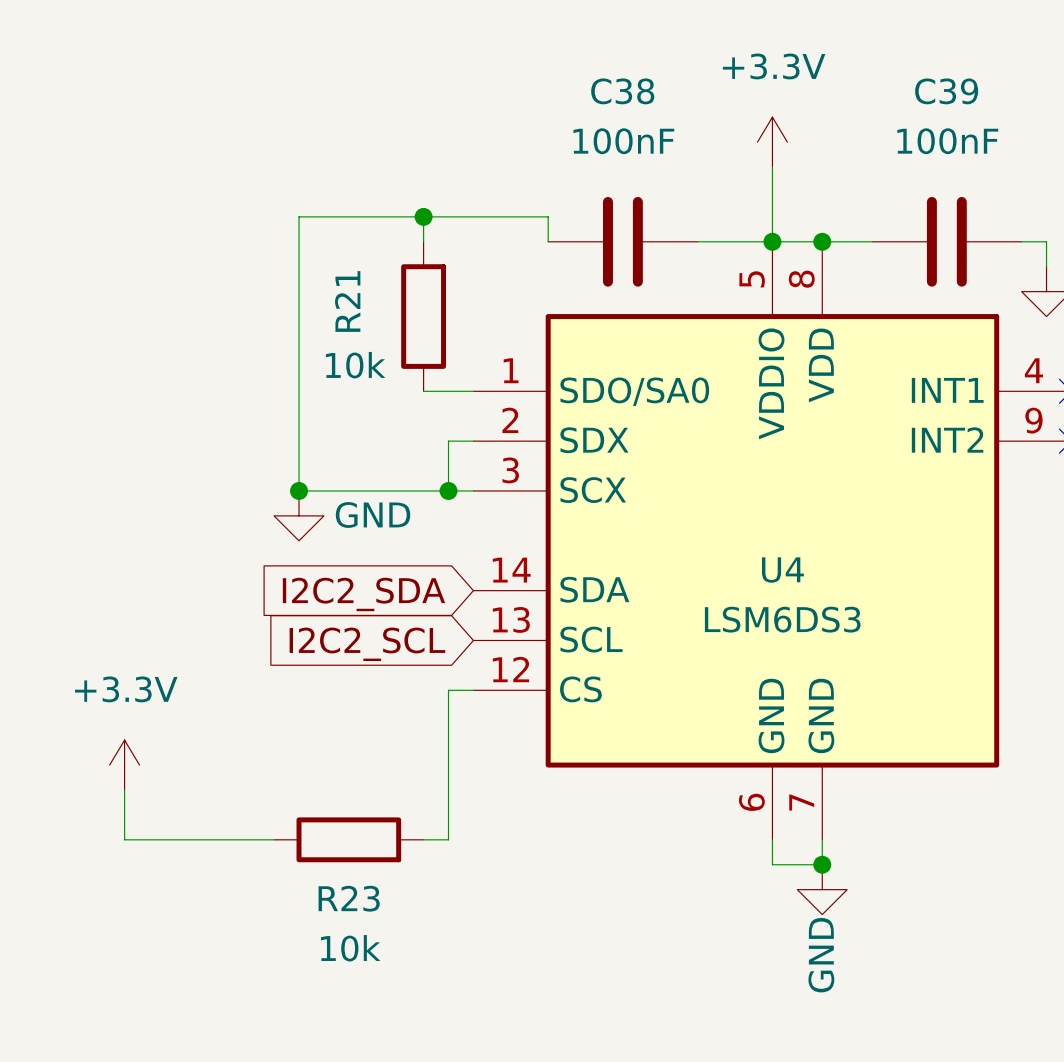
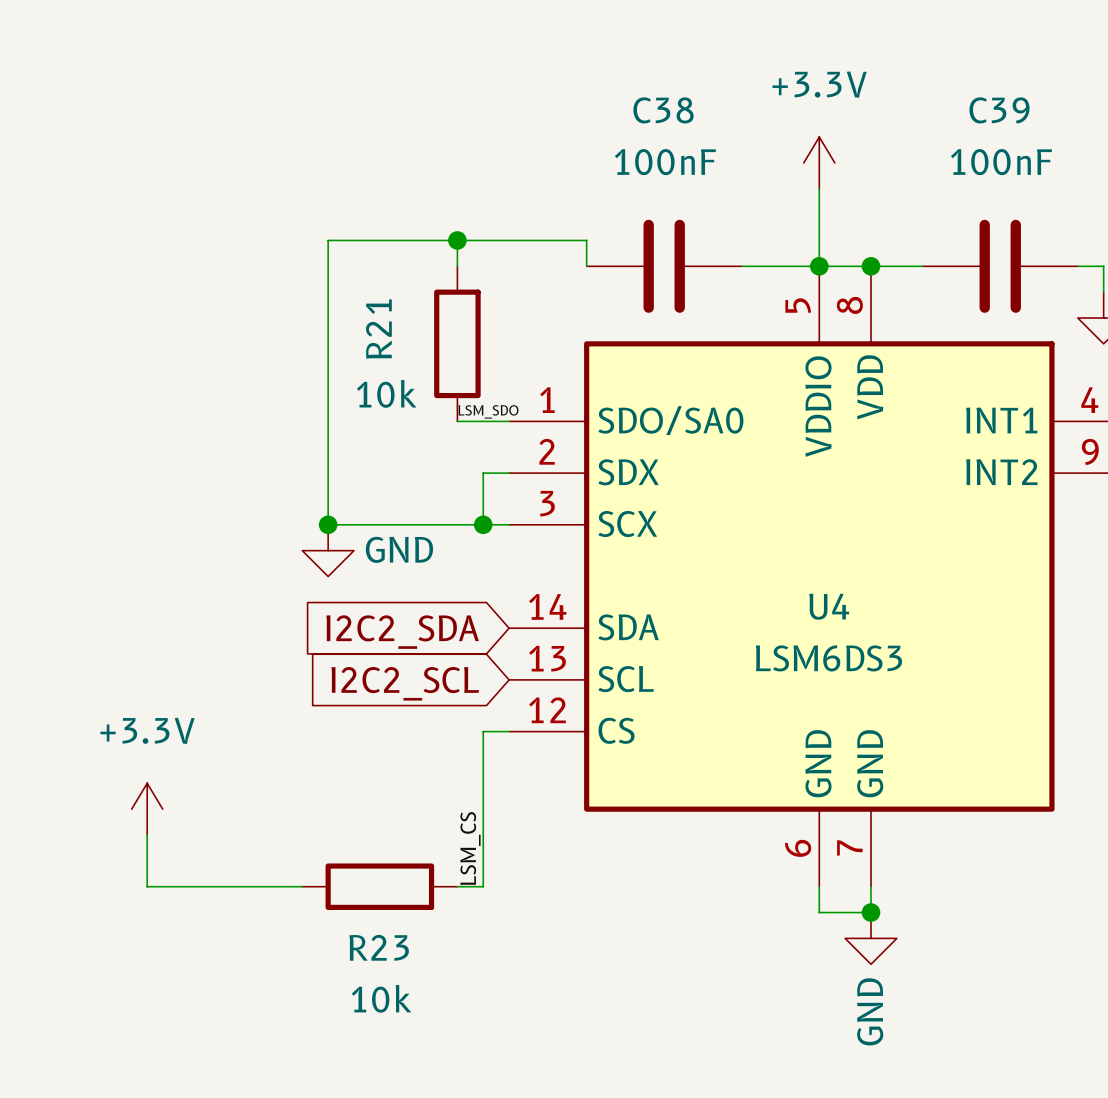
label: none -> LSM_SDO (488, 411)
label: none -> LSM_CS (470, 848)

